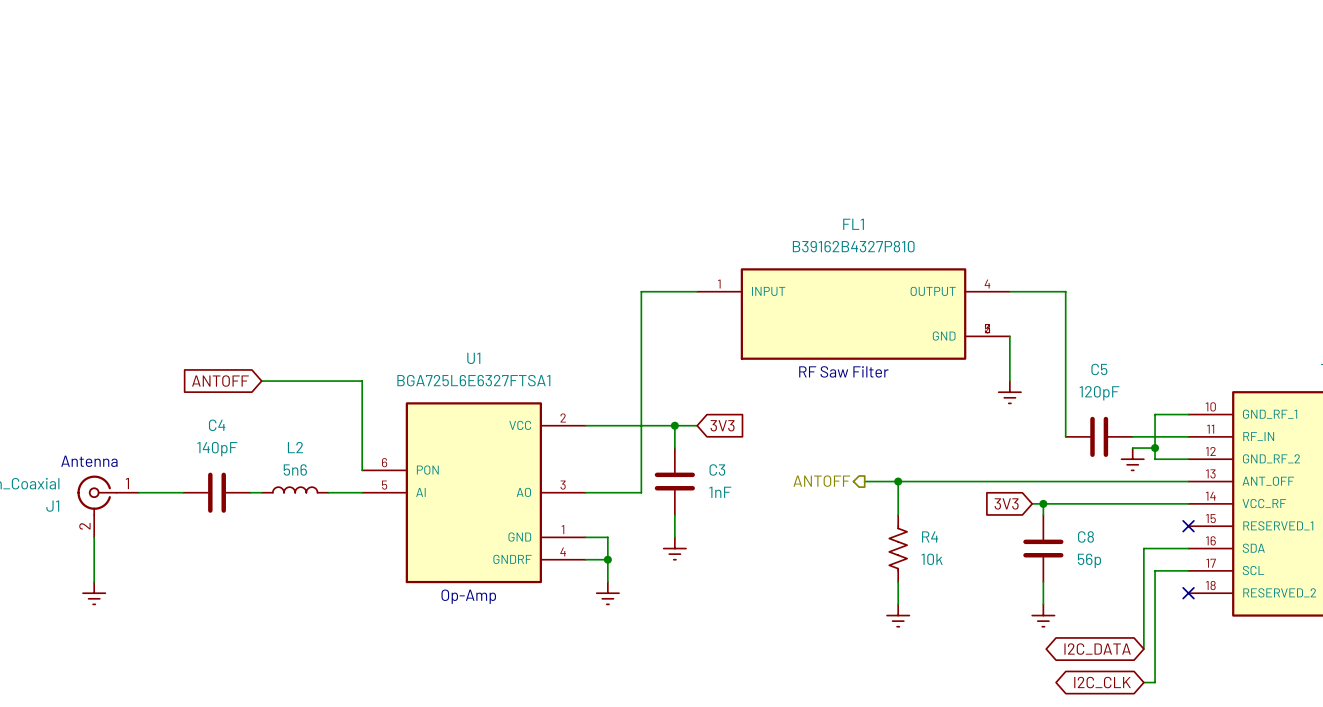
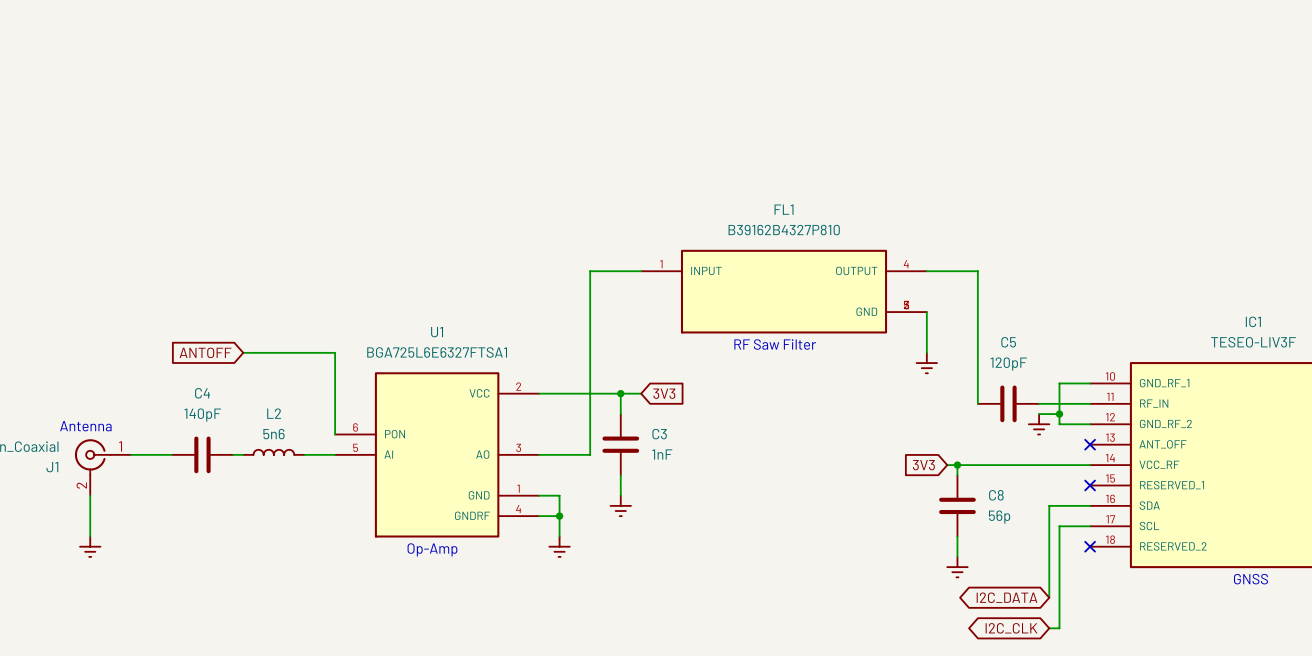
hierarchical label: ANTOFF (821, 481) -> none
wire: (864, 481) (1188, 481) -> none
wire: (898, 481) (898, 515) -> none
junction: (898, 481) -> none
no-connect mark: none -> (1090, 444)
R4: 10k (898, 548) -> none
wire: (898, 582) (898, 604) -> none
power symbol: (898, 615) -> none

